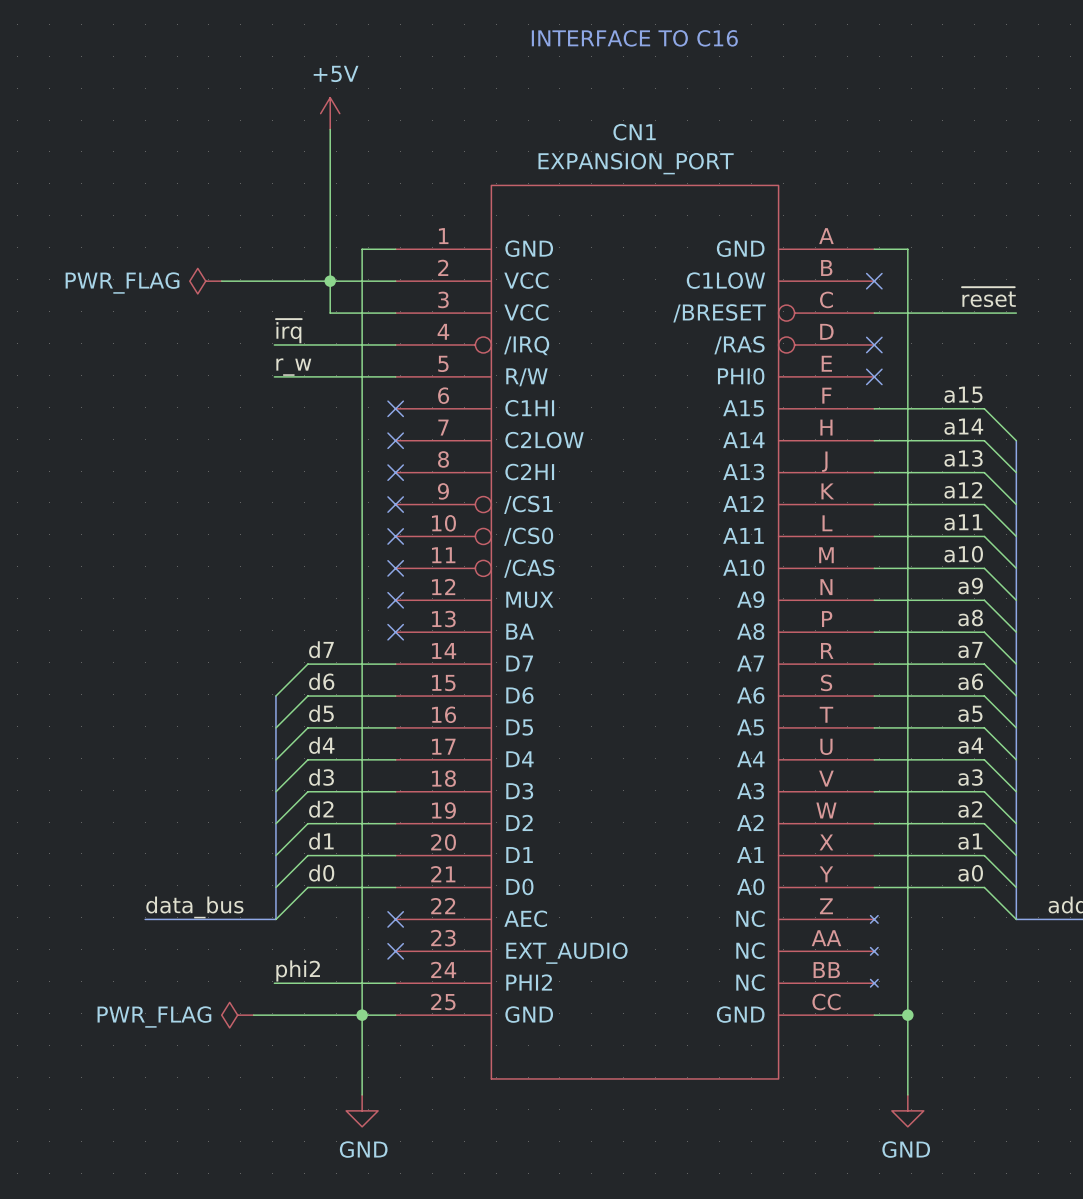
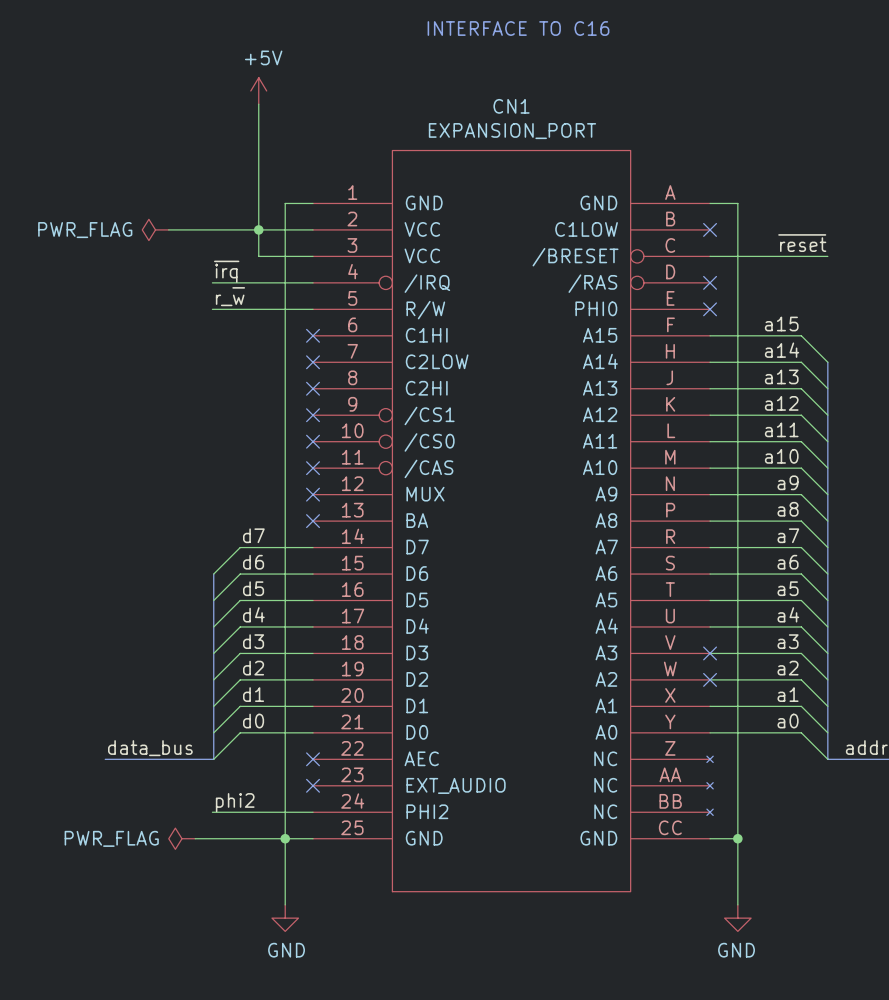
label: r_w (293, 367) -> r_~{w} (230, 296)
no-connect mark: none -> (710, 653)
no-connect mark: none -> (710, 679)

